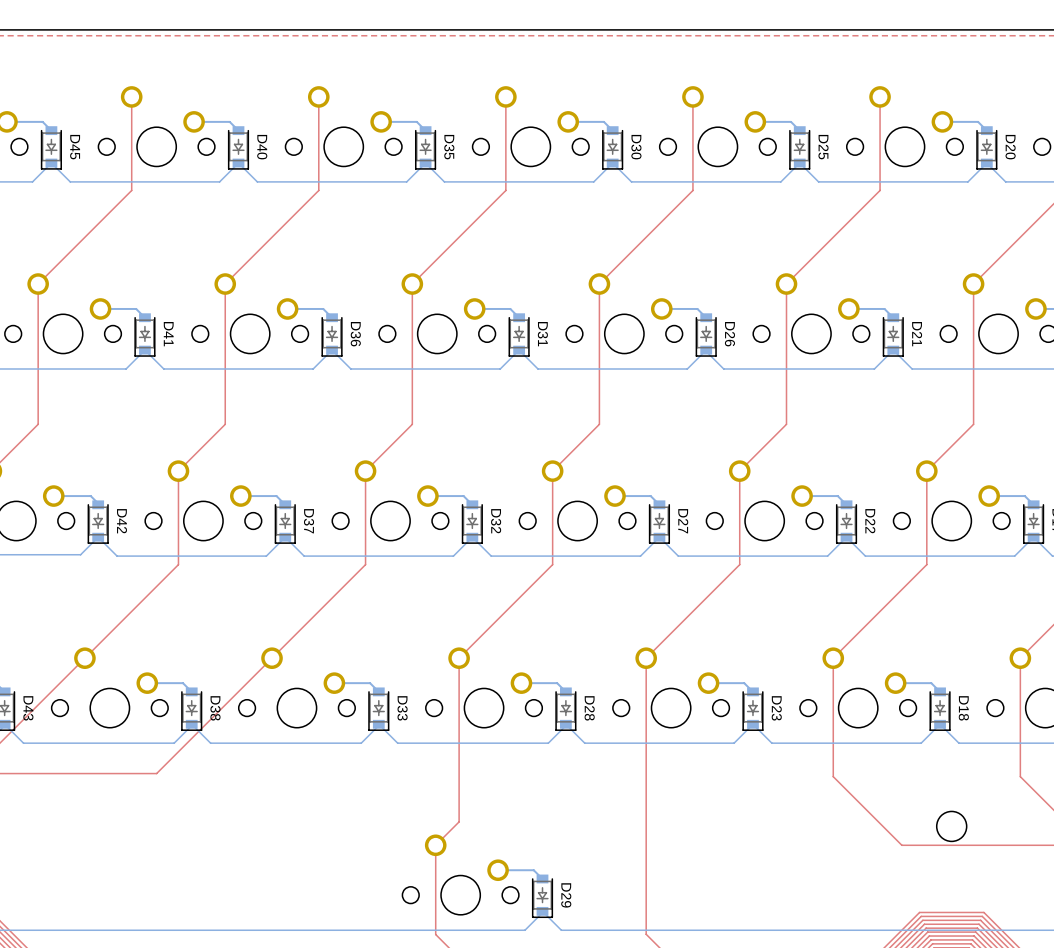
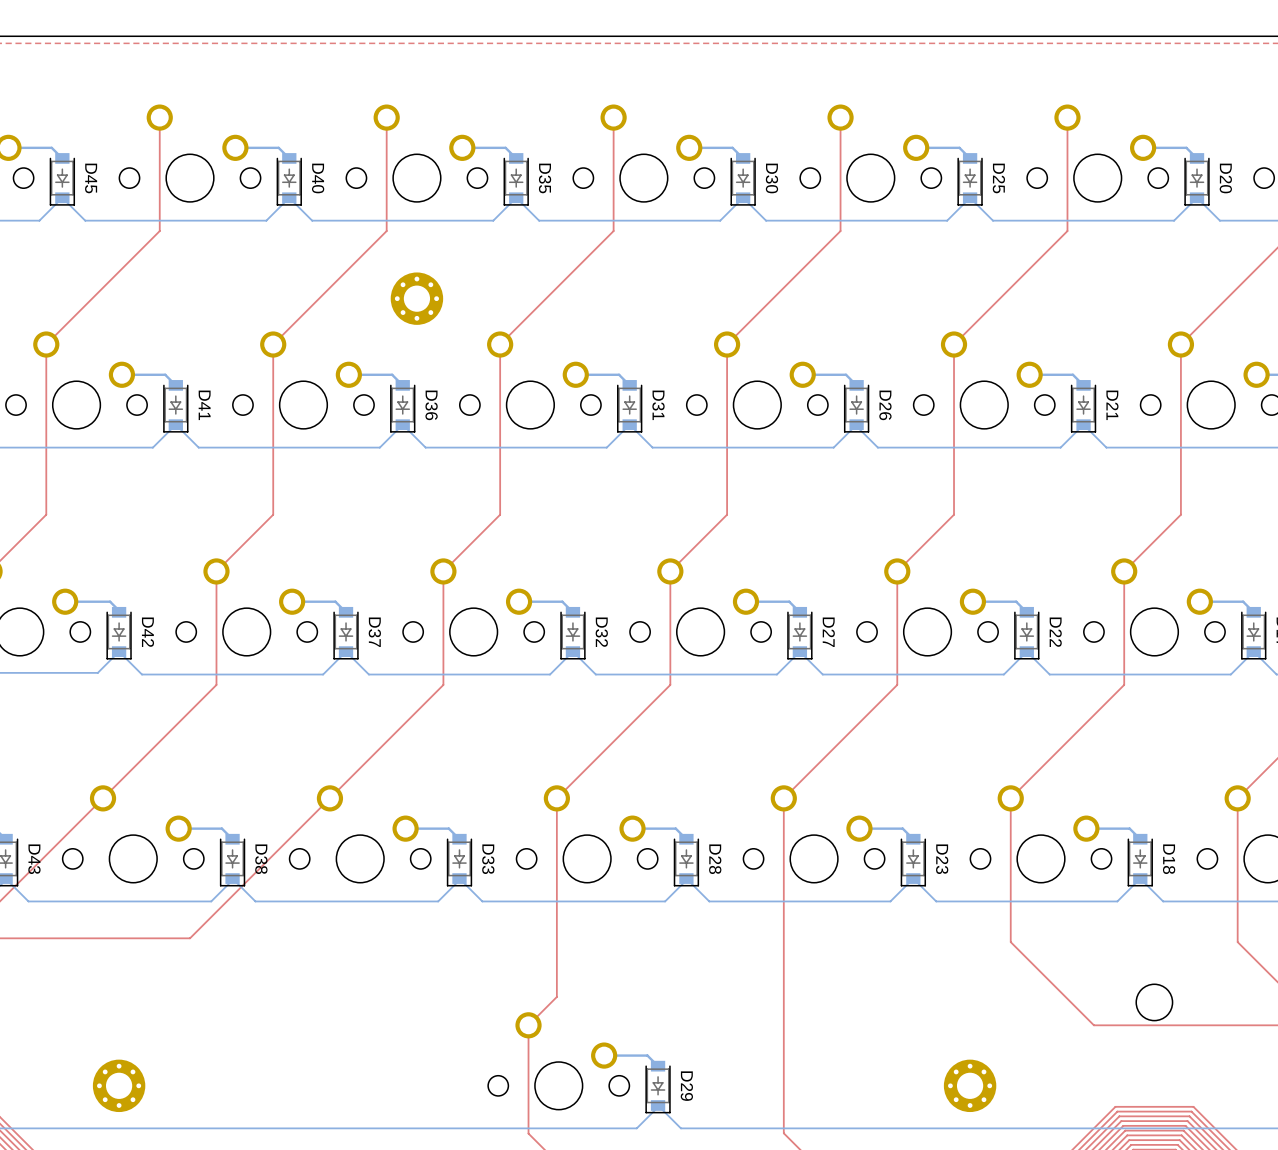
part: none -> (416, 298)
part: none -> (119, 1085)
part: none -> (970, 1085)

